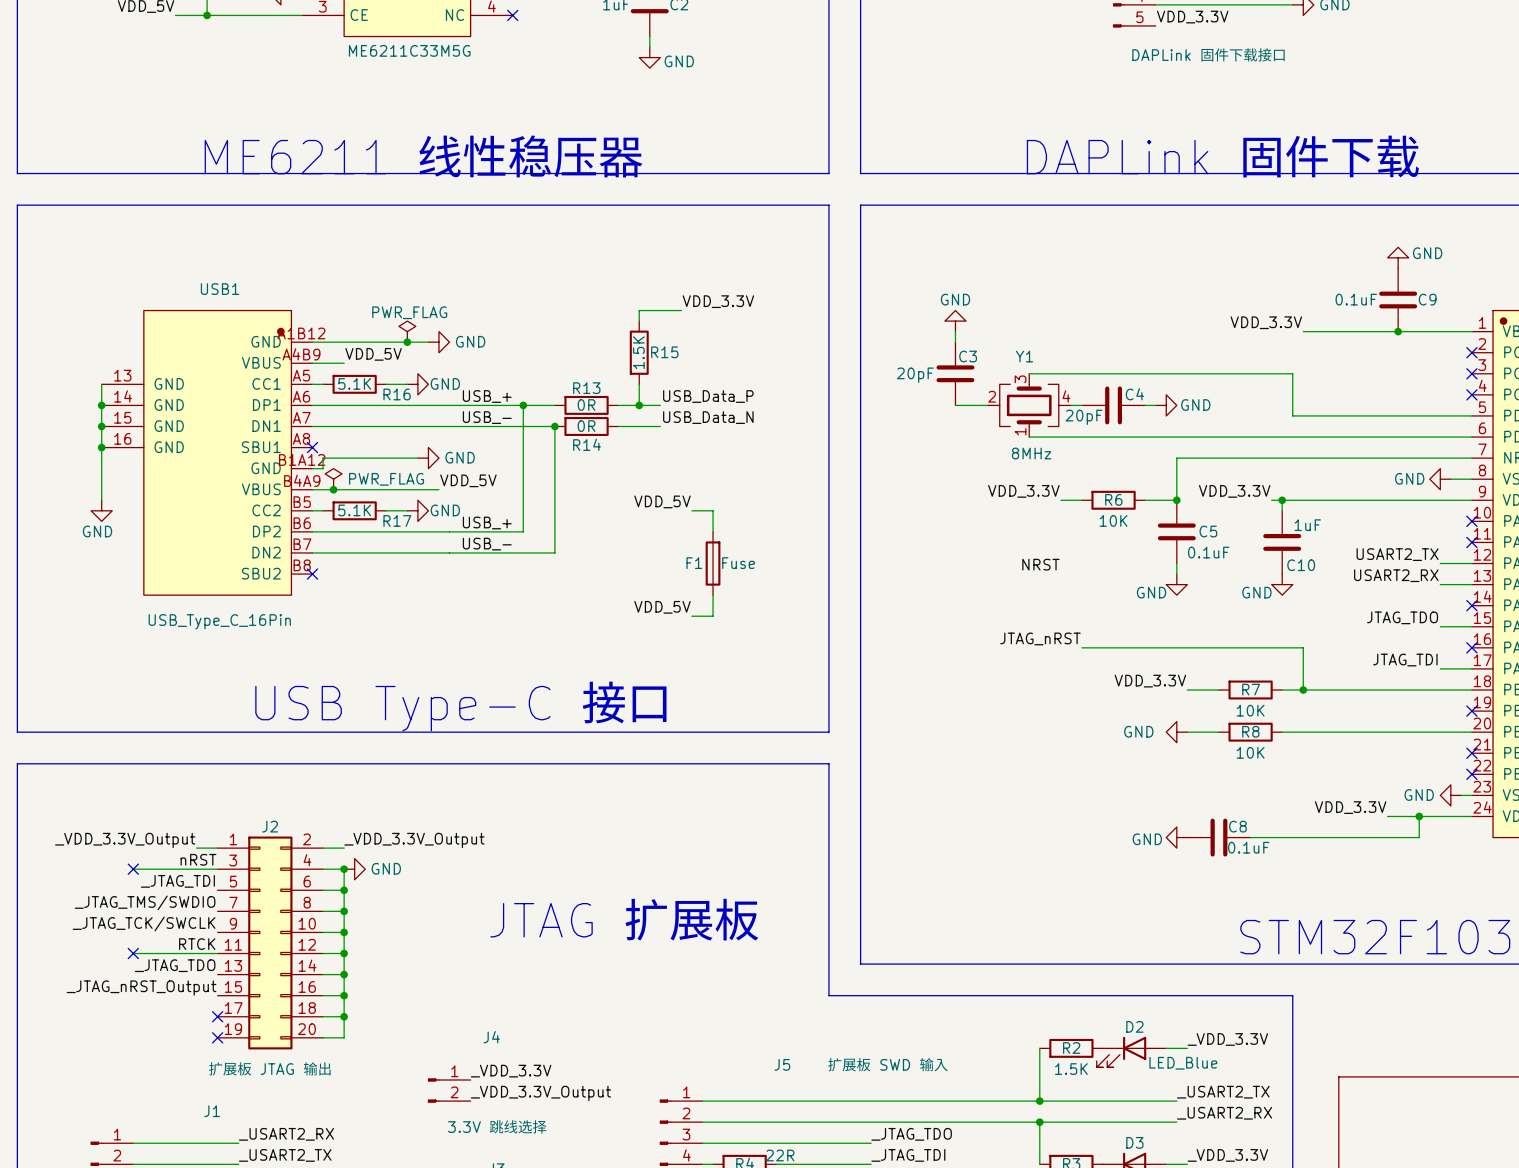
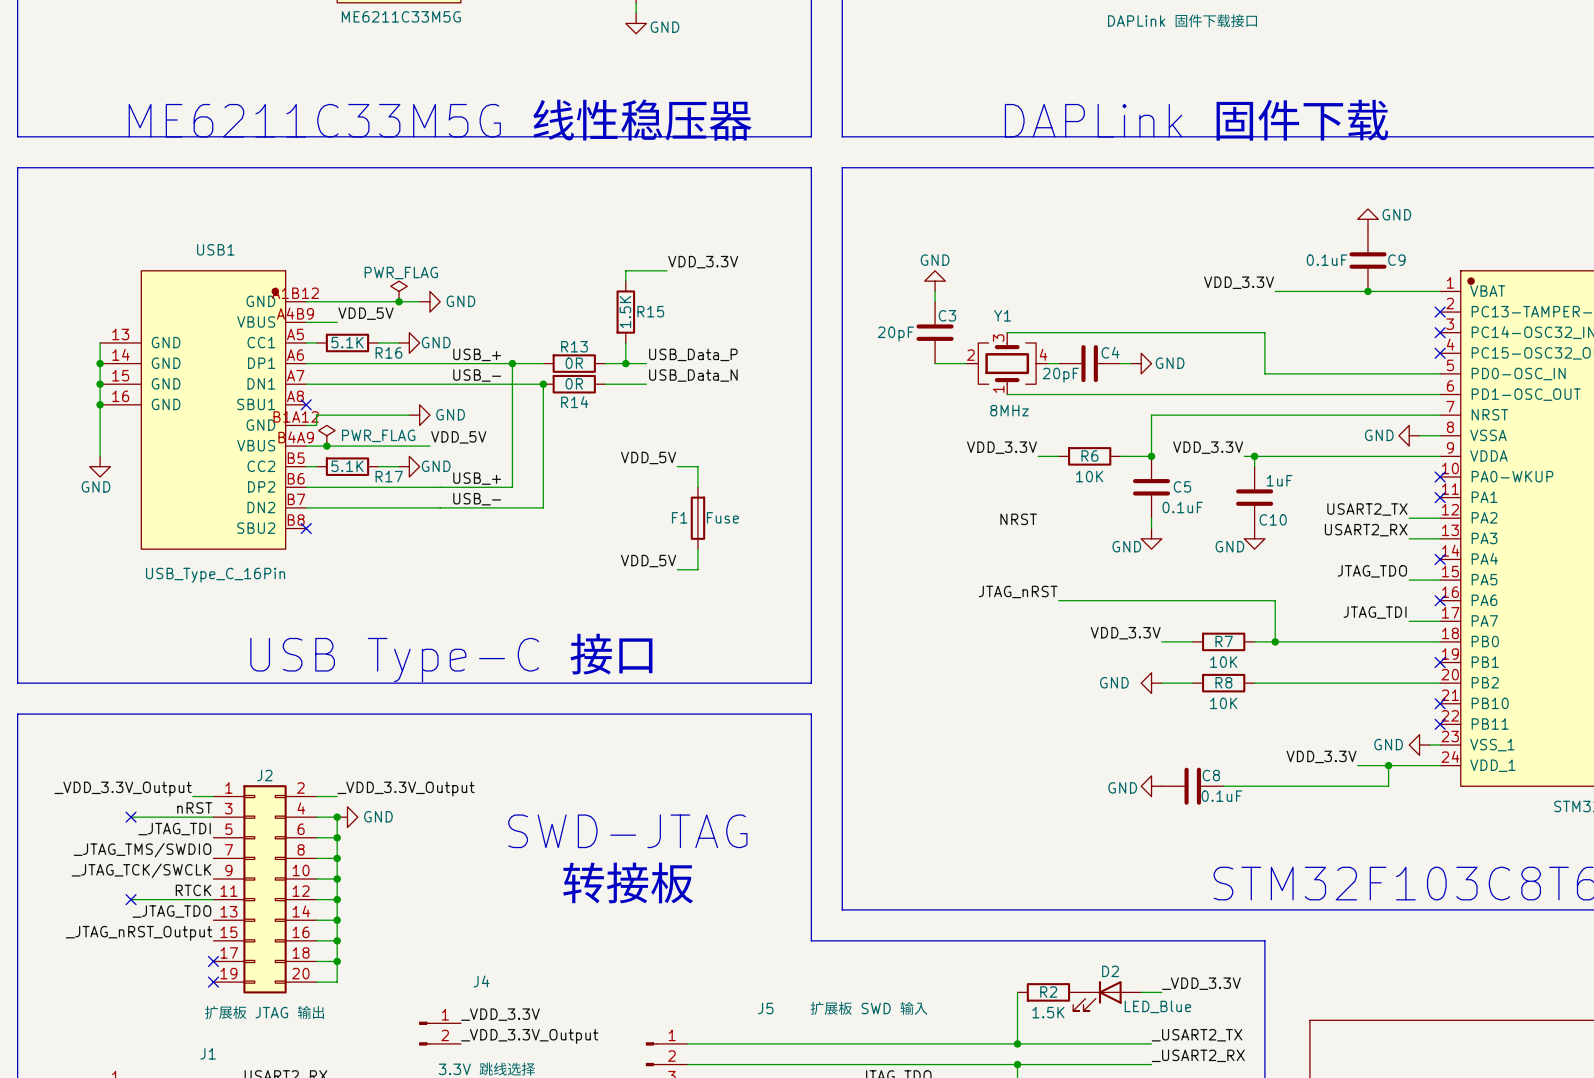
text: ME6211 线性稳压器 (423, 156) -> ME6211C33M5G 线性稳压器 (440, 120)
text: none -> SWD-JTAG (627, 831)
text: JTAG 扩展板 (624, 919) -> none
text: none -> 转接板 (628, 882)

